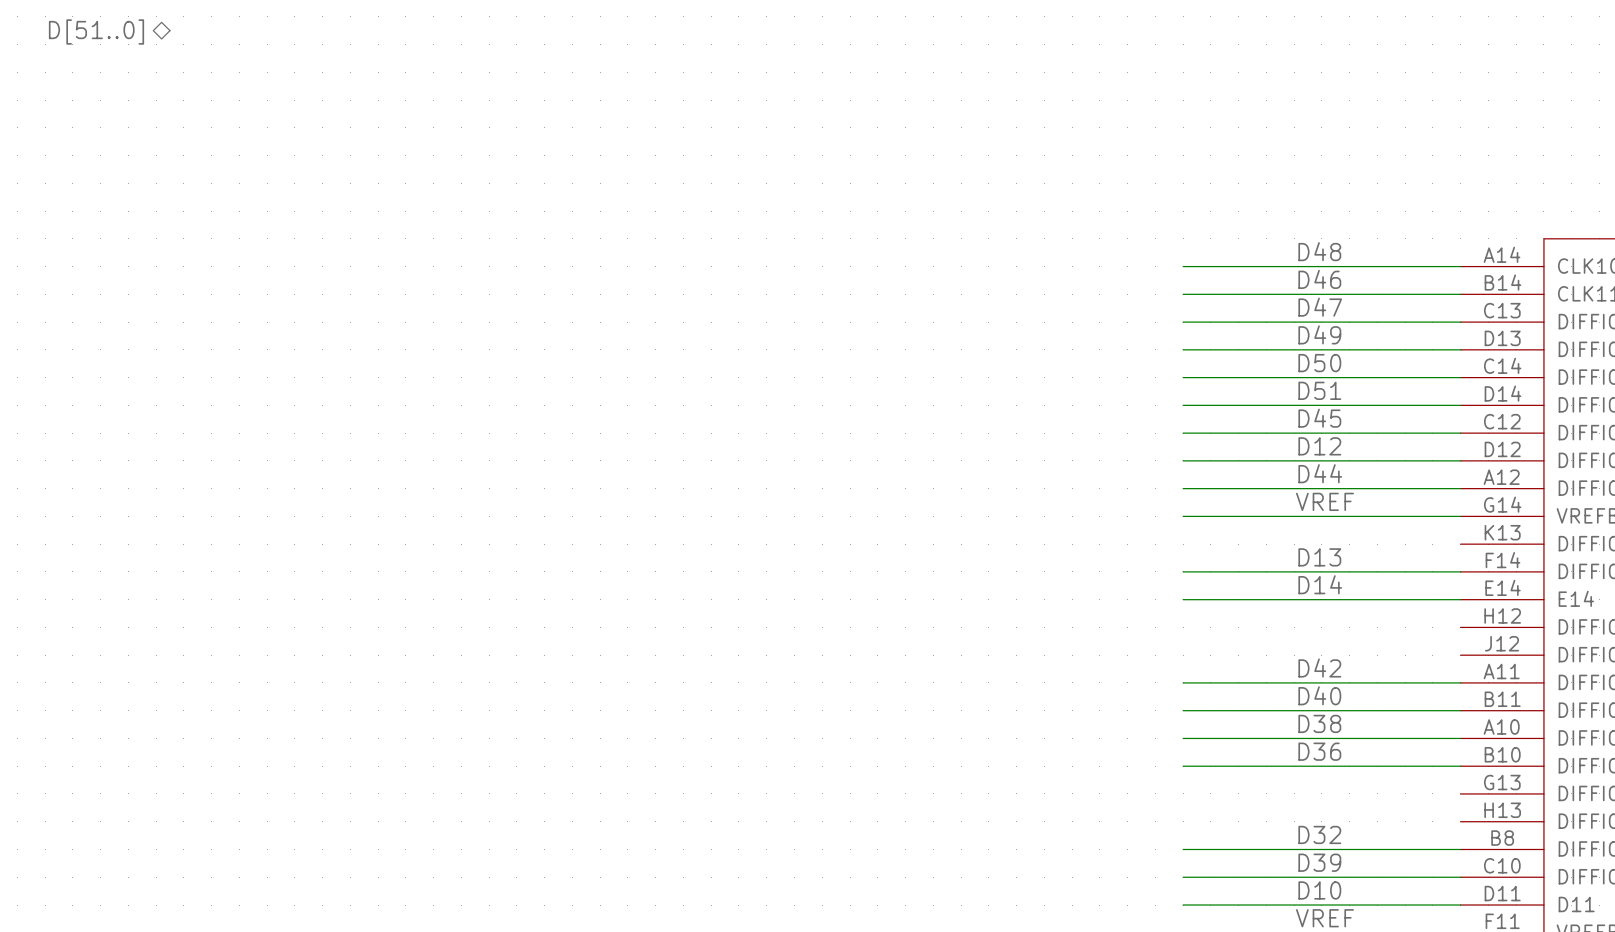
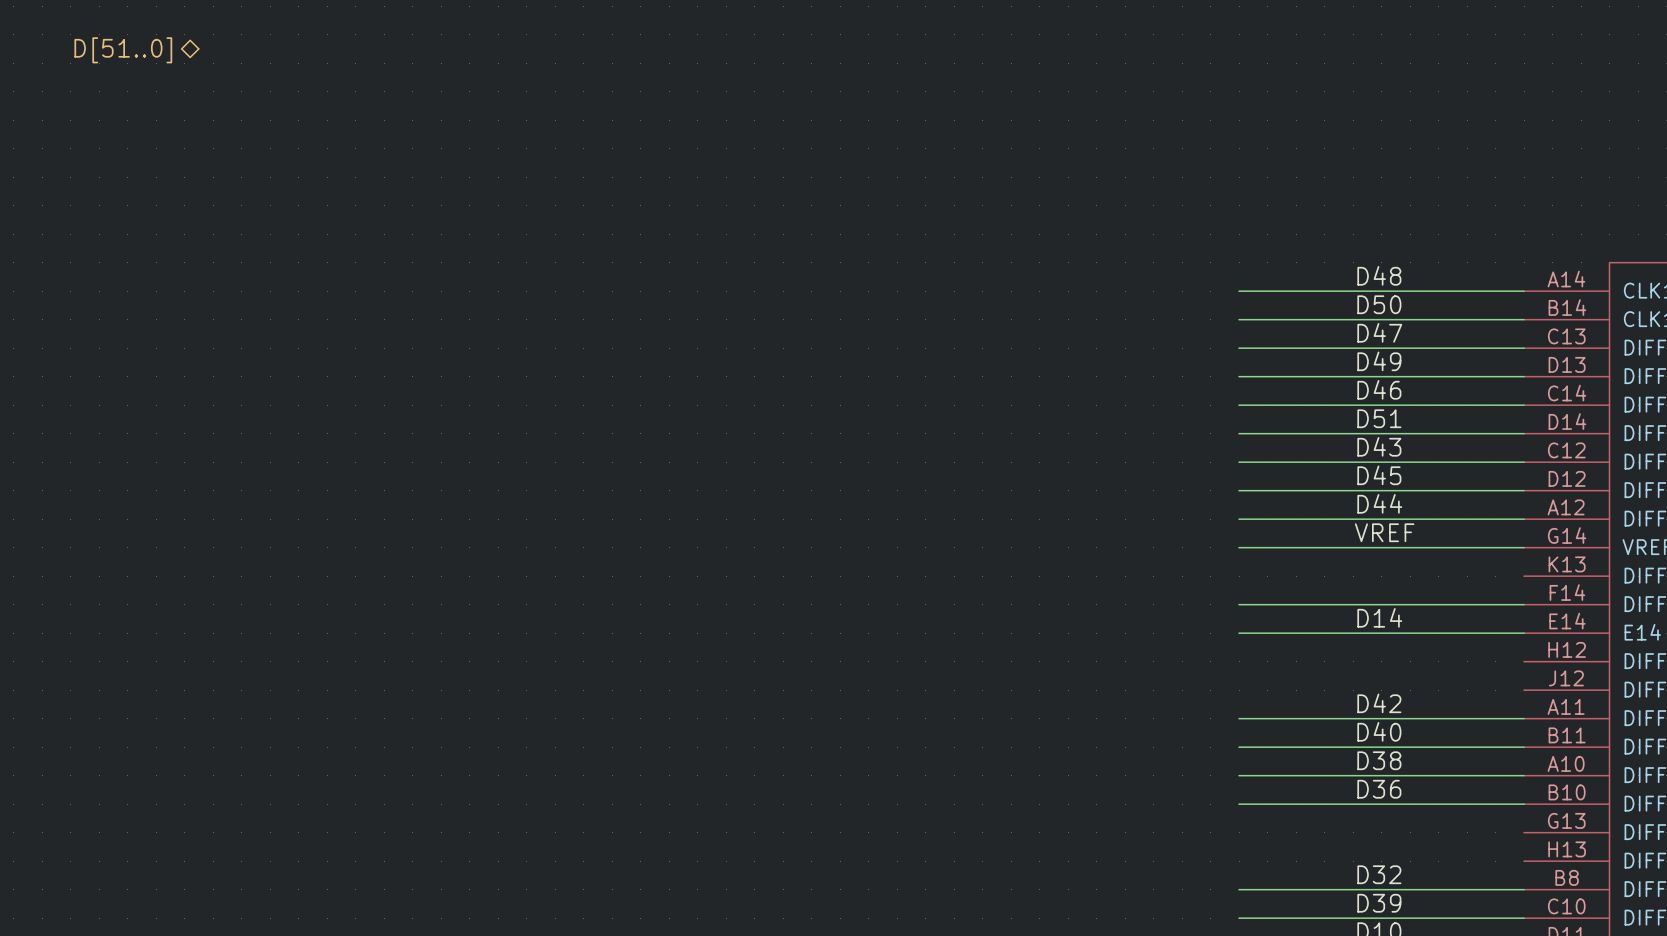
label: D46 (1319, 279) -> D50 (1379, 304)
label: D50 (1319, 363) -> D46 (1379, 389)
label: D45 (1319, 418) -> D43 (1379, 446)
label: D12 (1319, 446) -> D45 (1379, 475)
label: D13 (1319, 557) -> none

